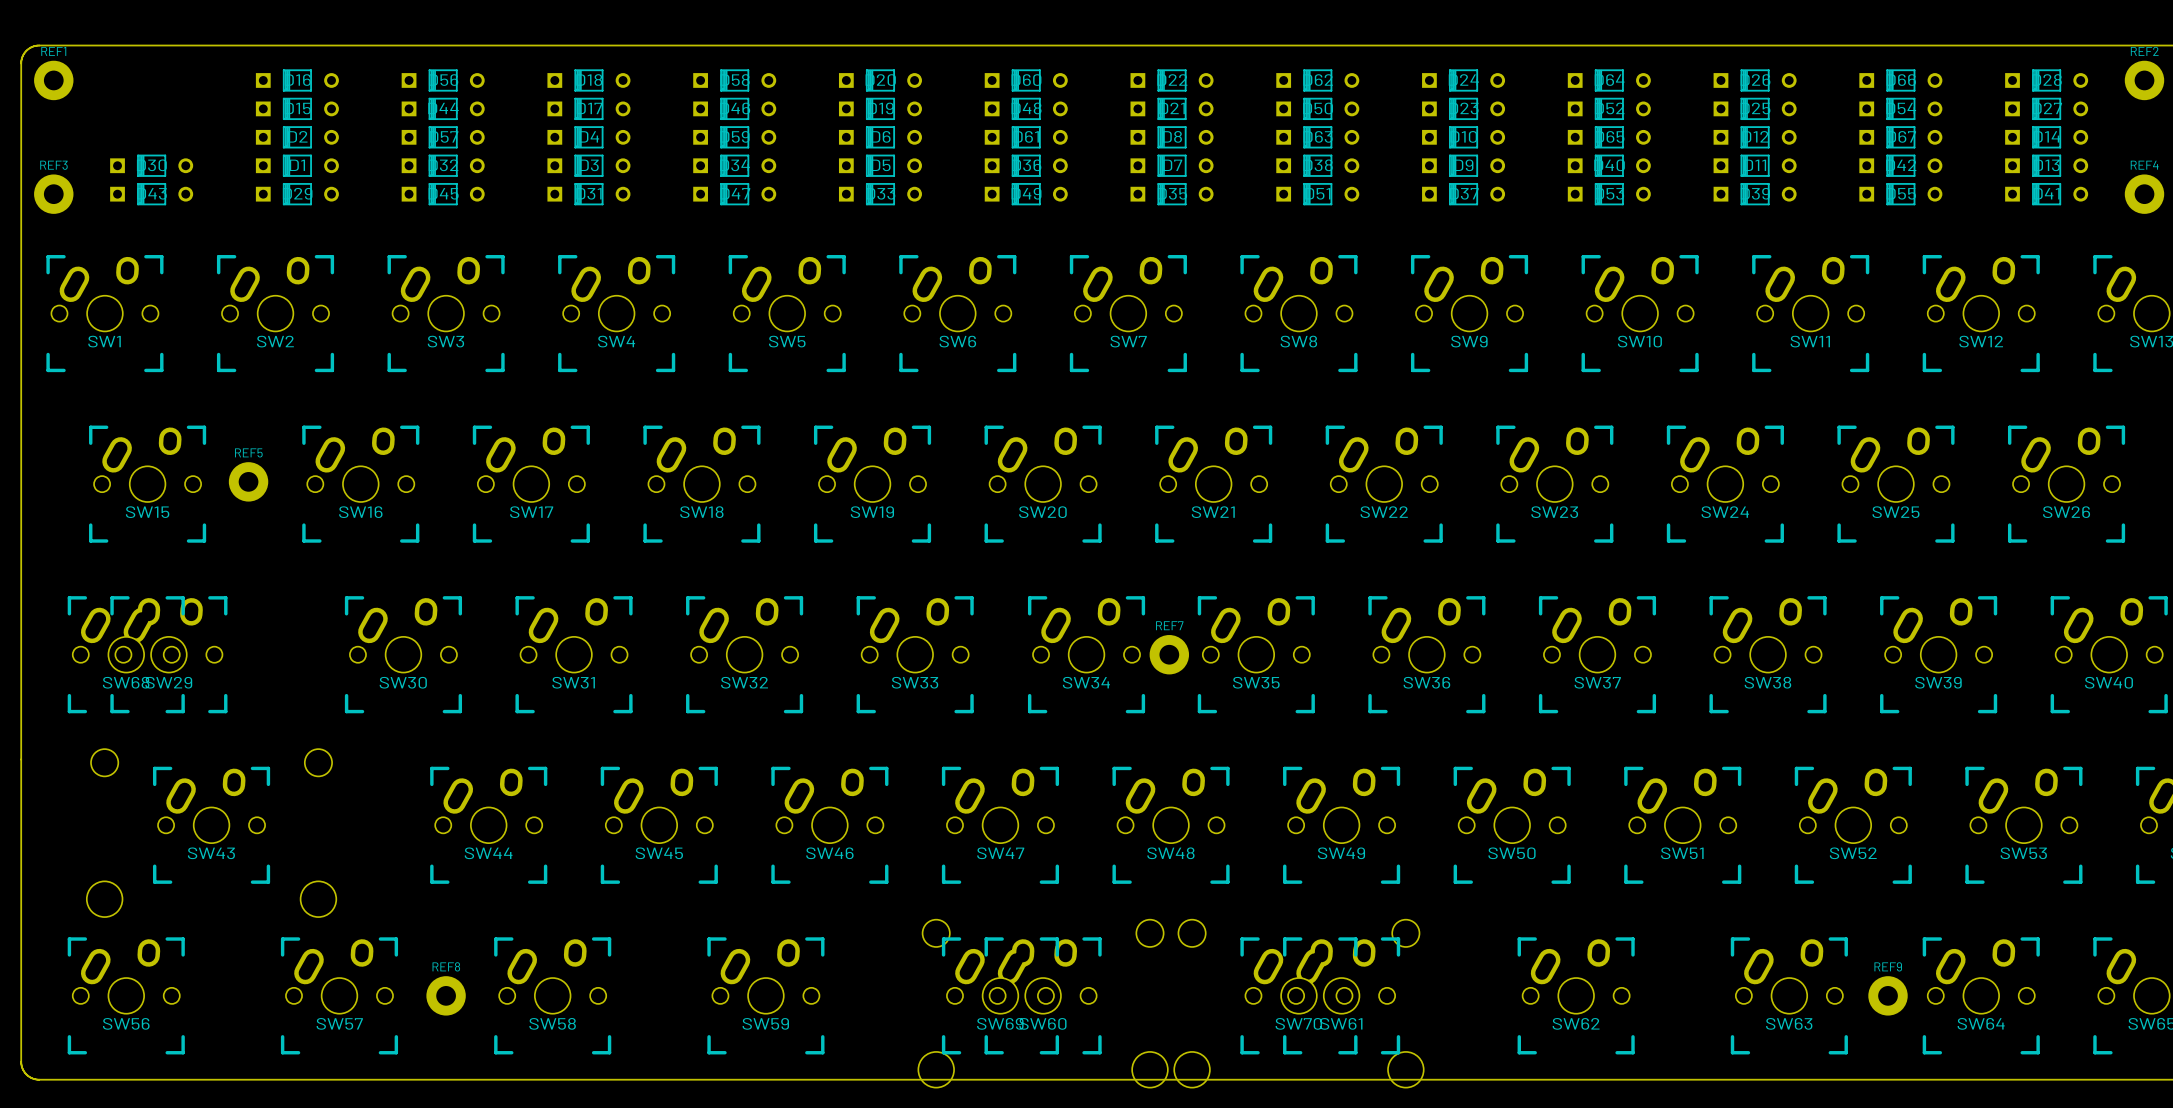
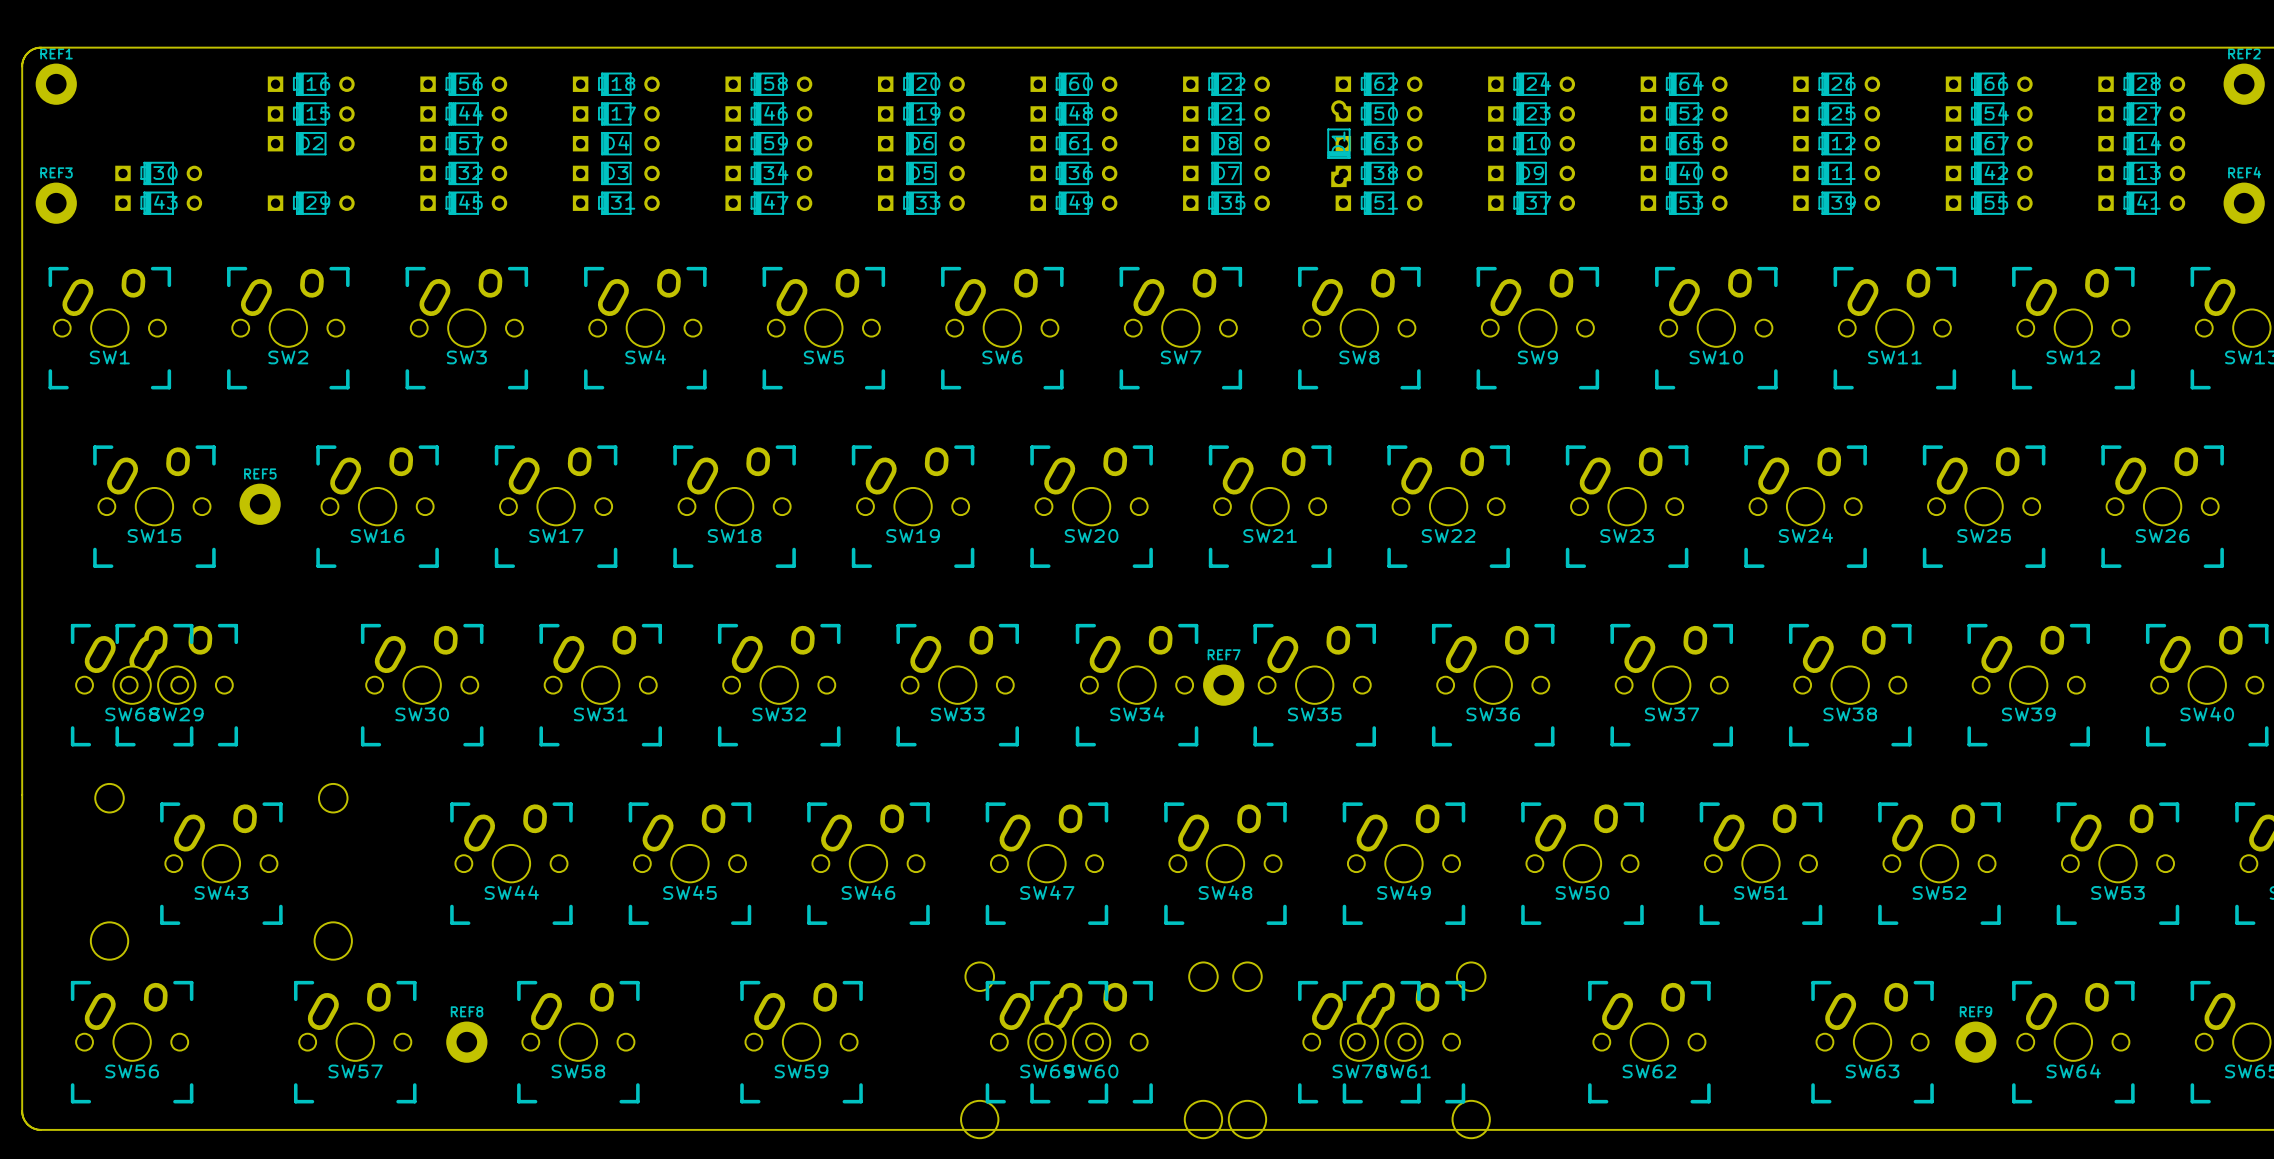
D1 rotation: 0° (297, 165) -> 90° counterclockwise (1338, 143)
D1 position: (297, 165) -> (1338, 143)

